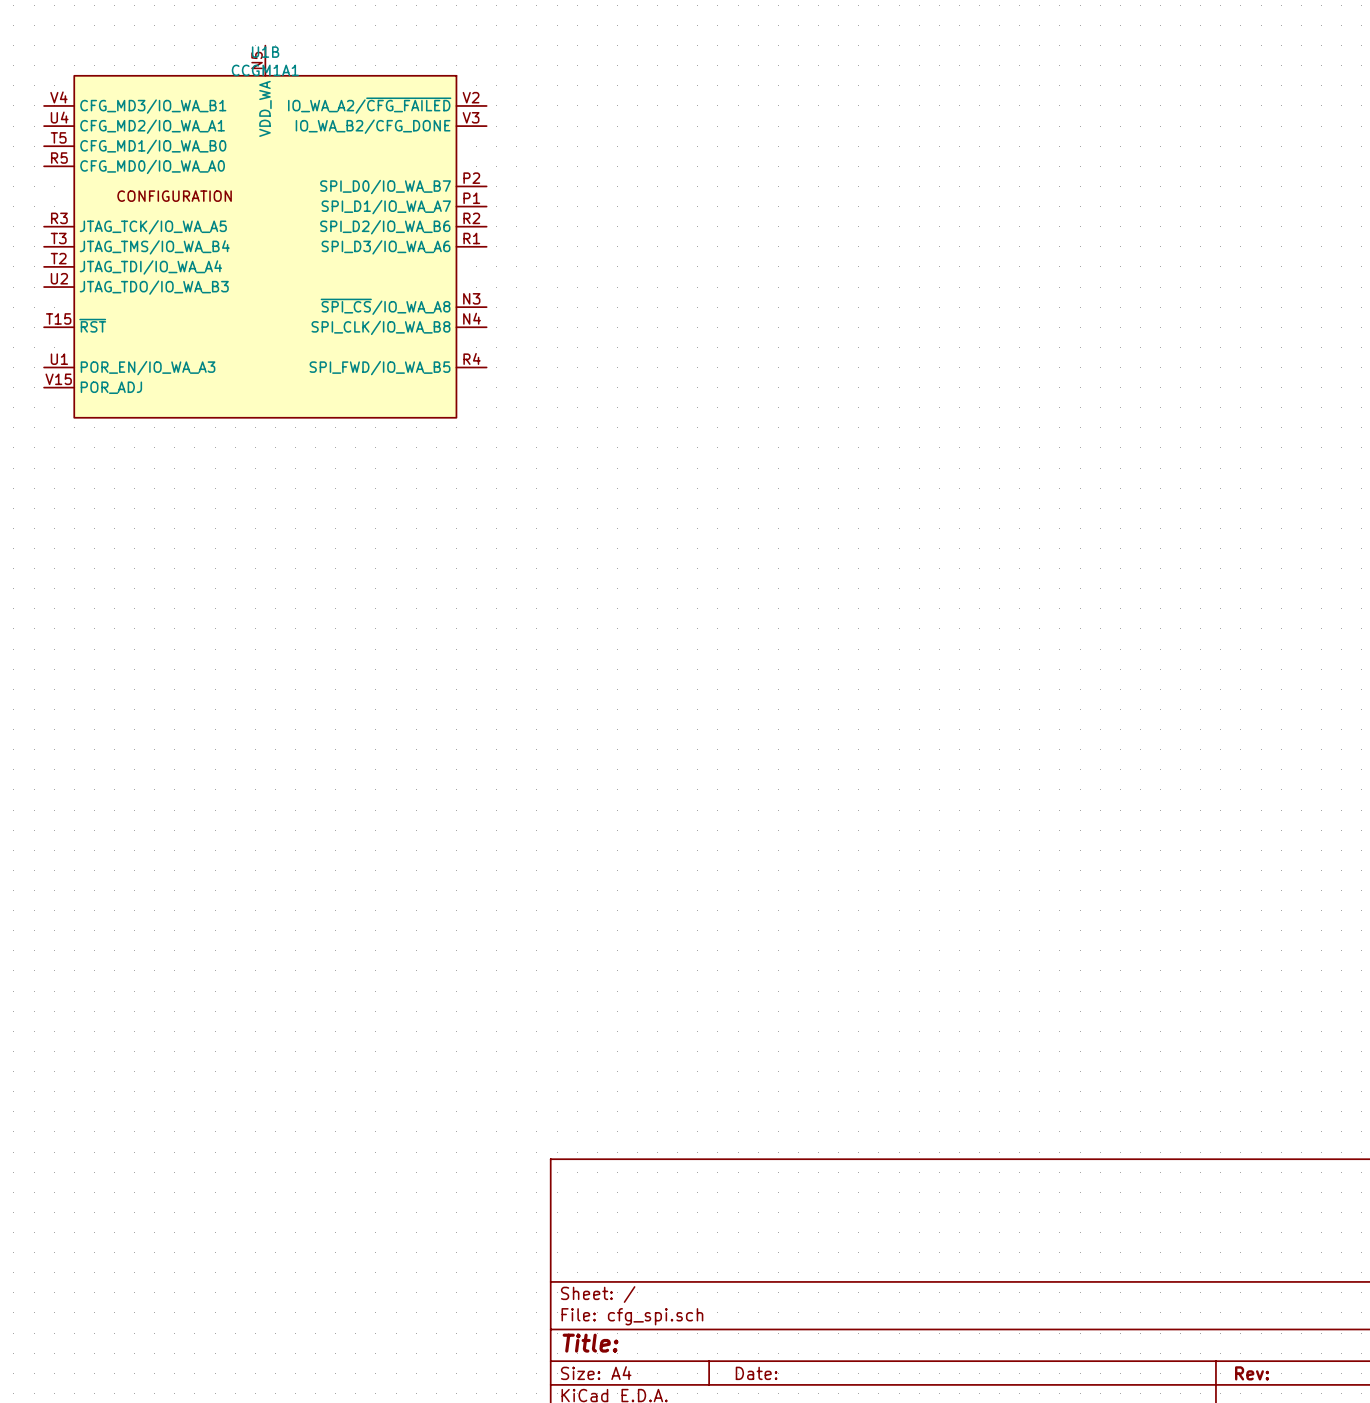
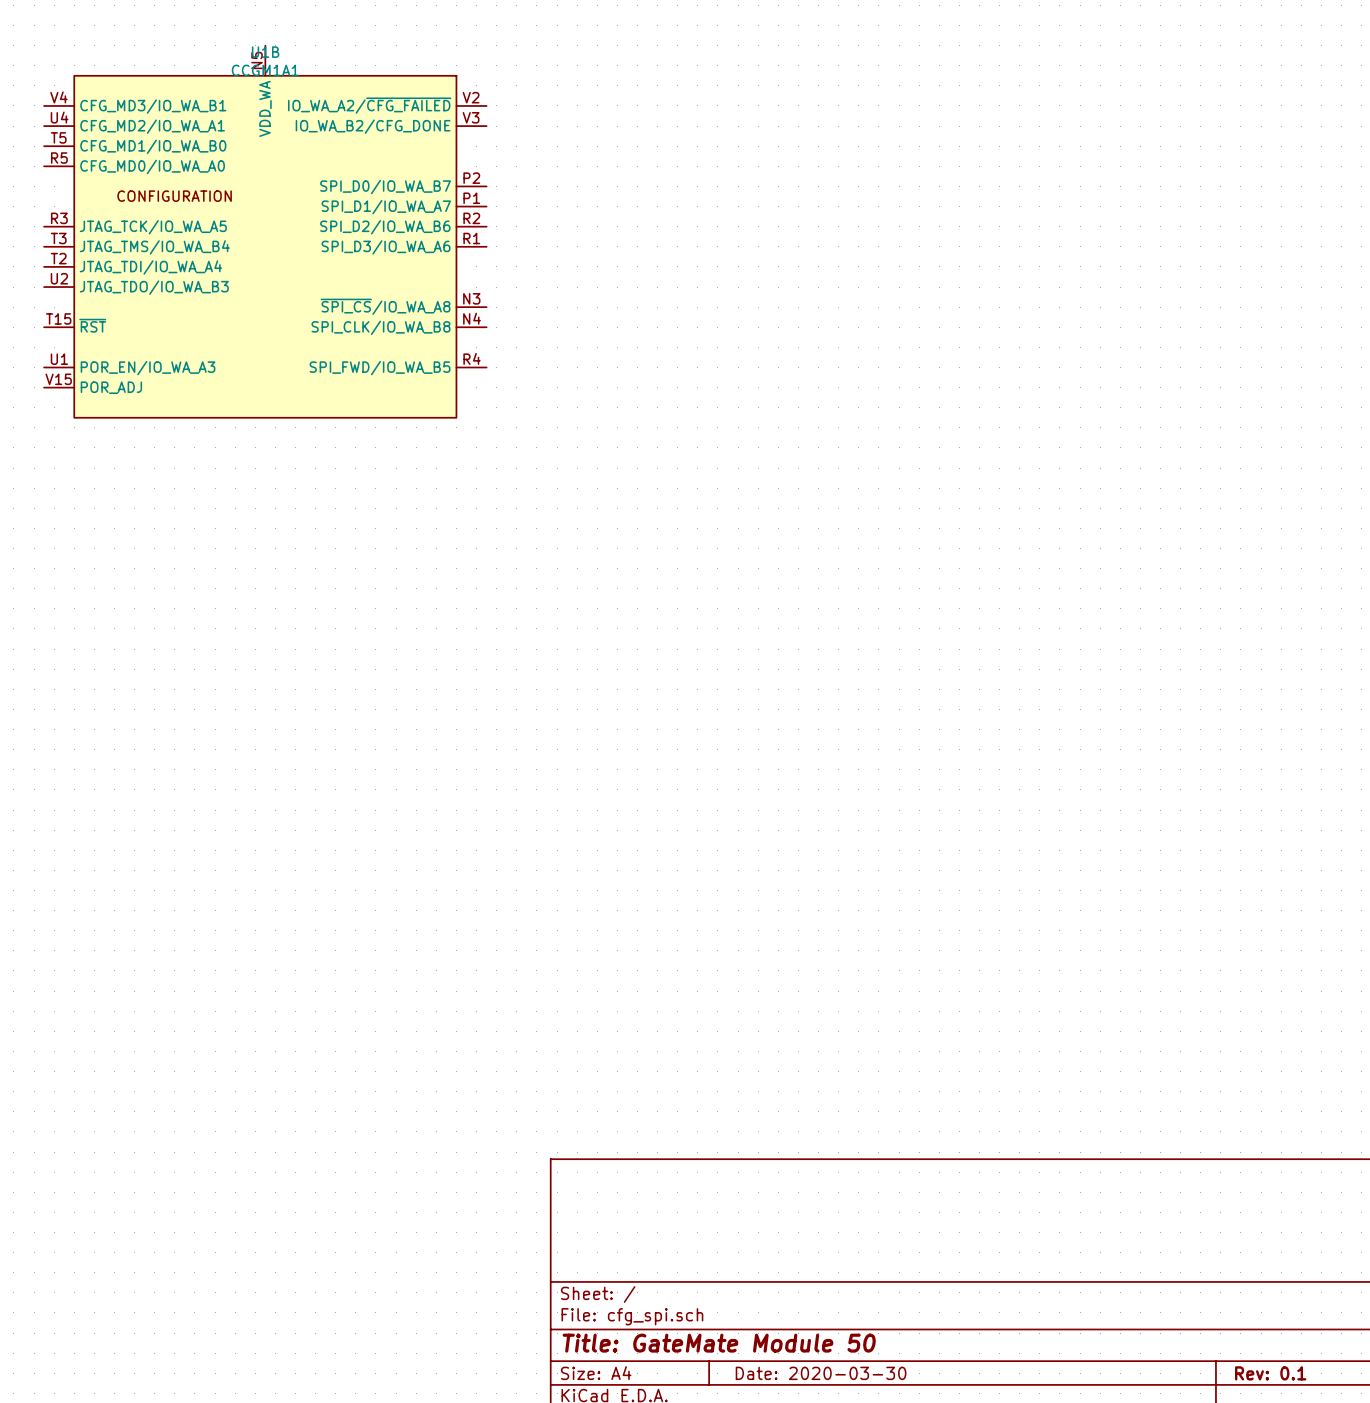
title block: Title: (590, 1343) -> Title: GateMate Module 50 (719, 1343)
title block: Date: (756, 1373) -> Date: 2020-03-30 (821, 1373)
title block: Rev: (1252, 1373) -> Rev: 0.1 (1270, 1373)

